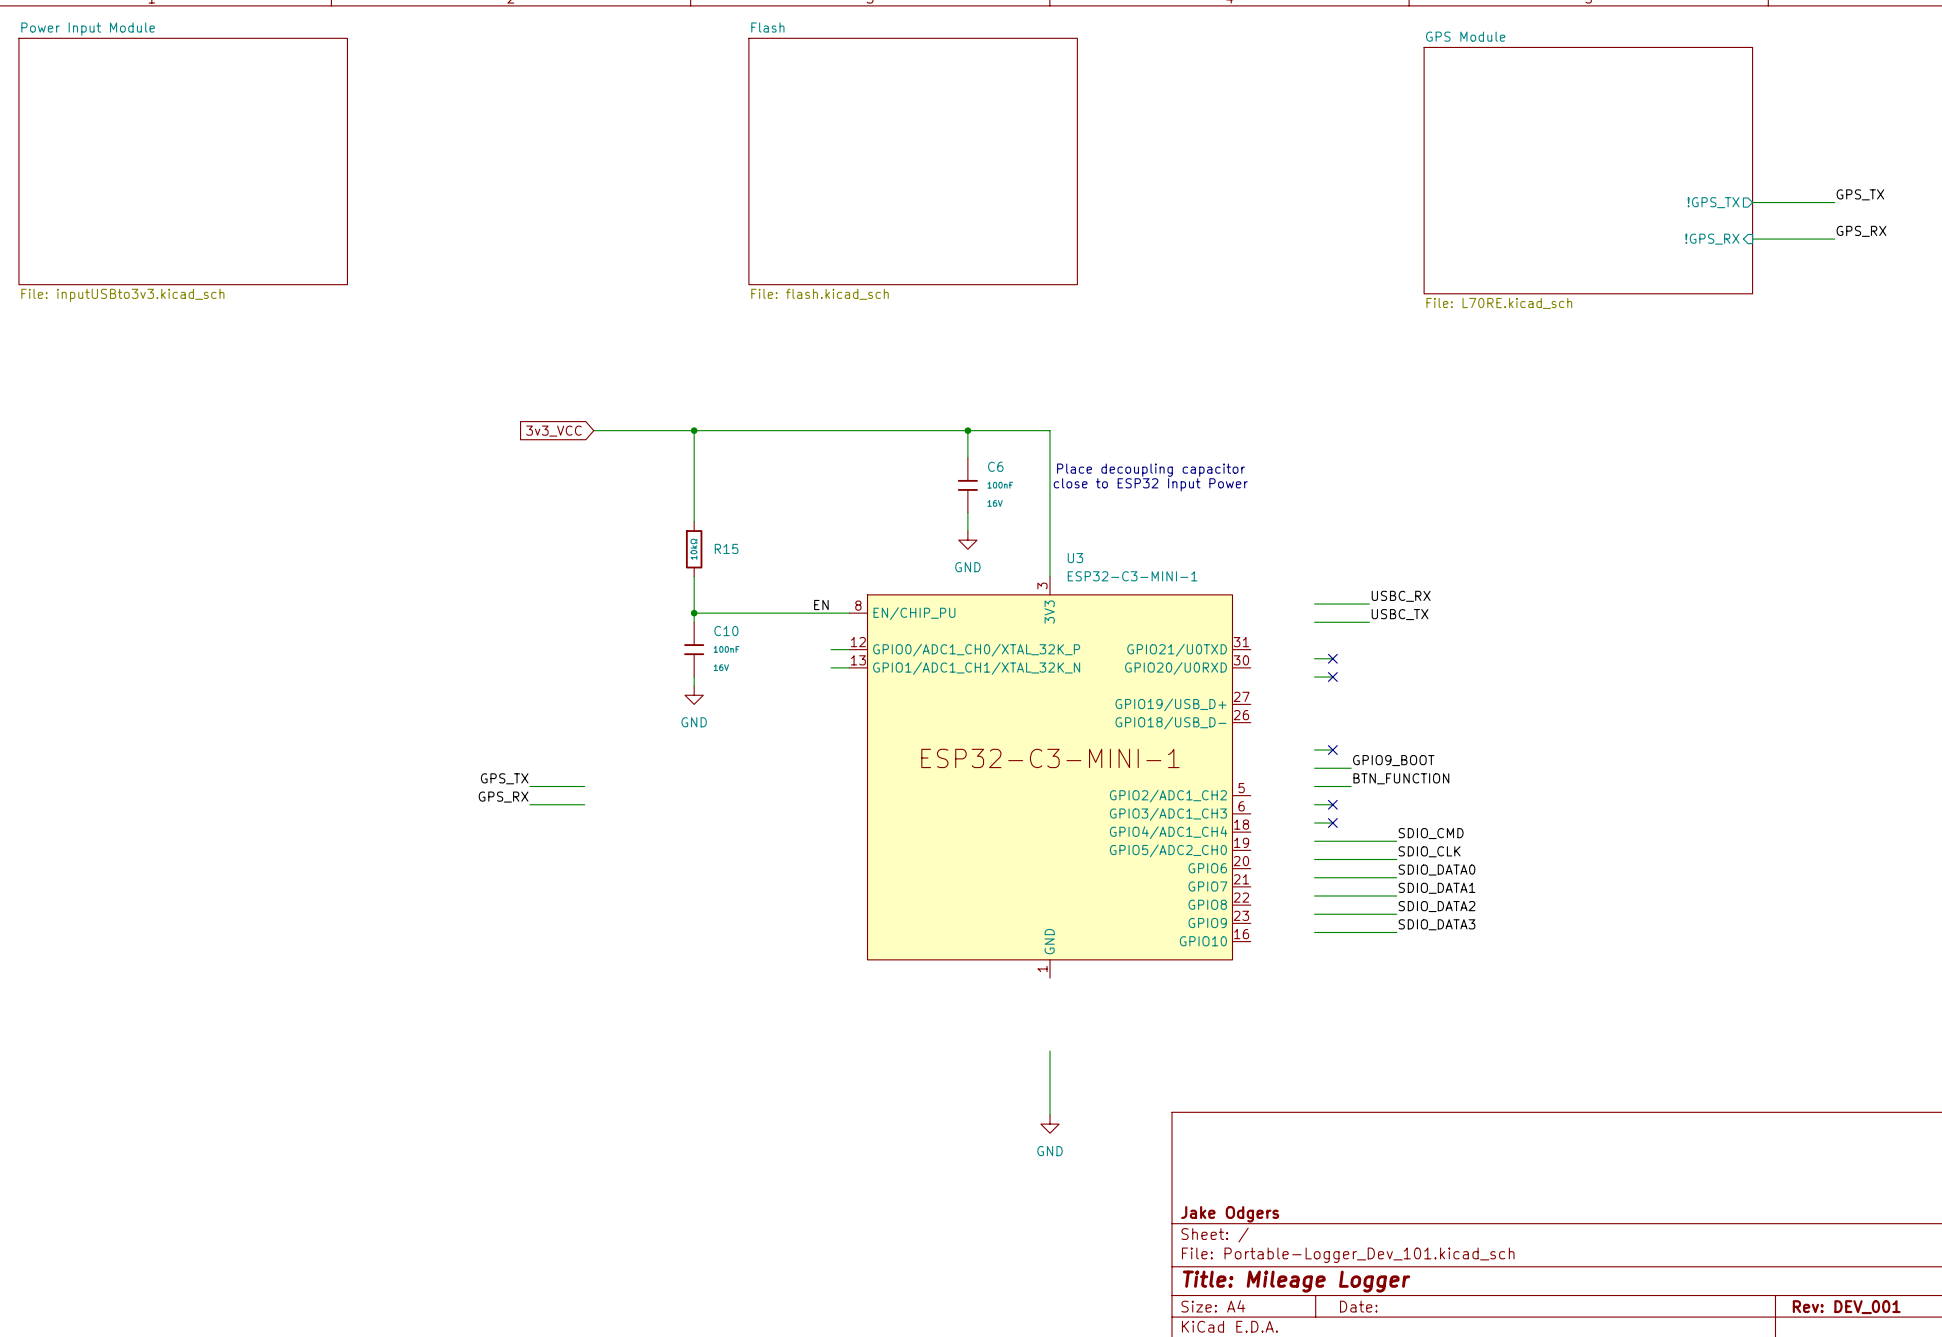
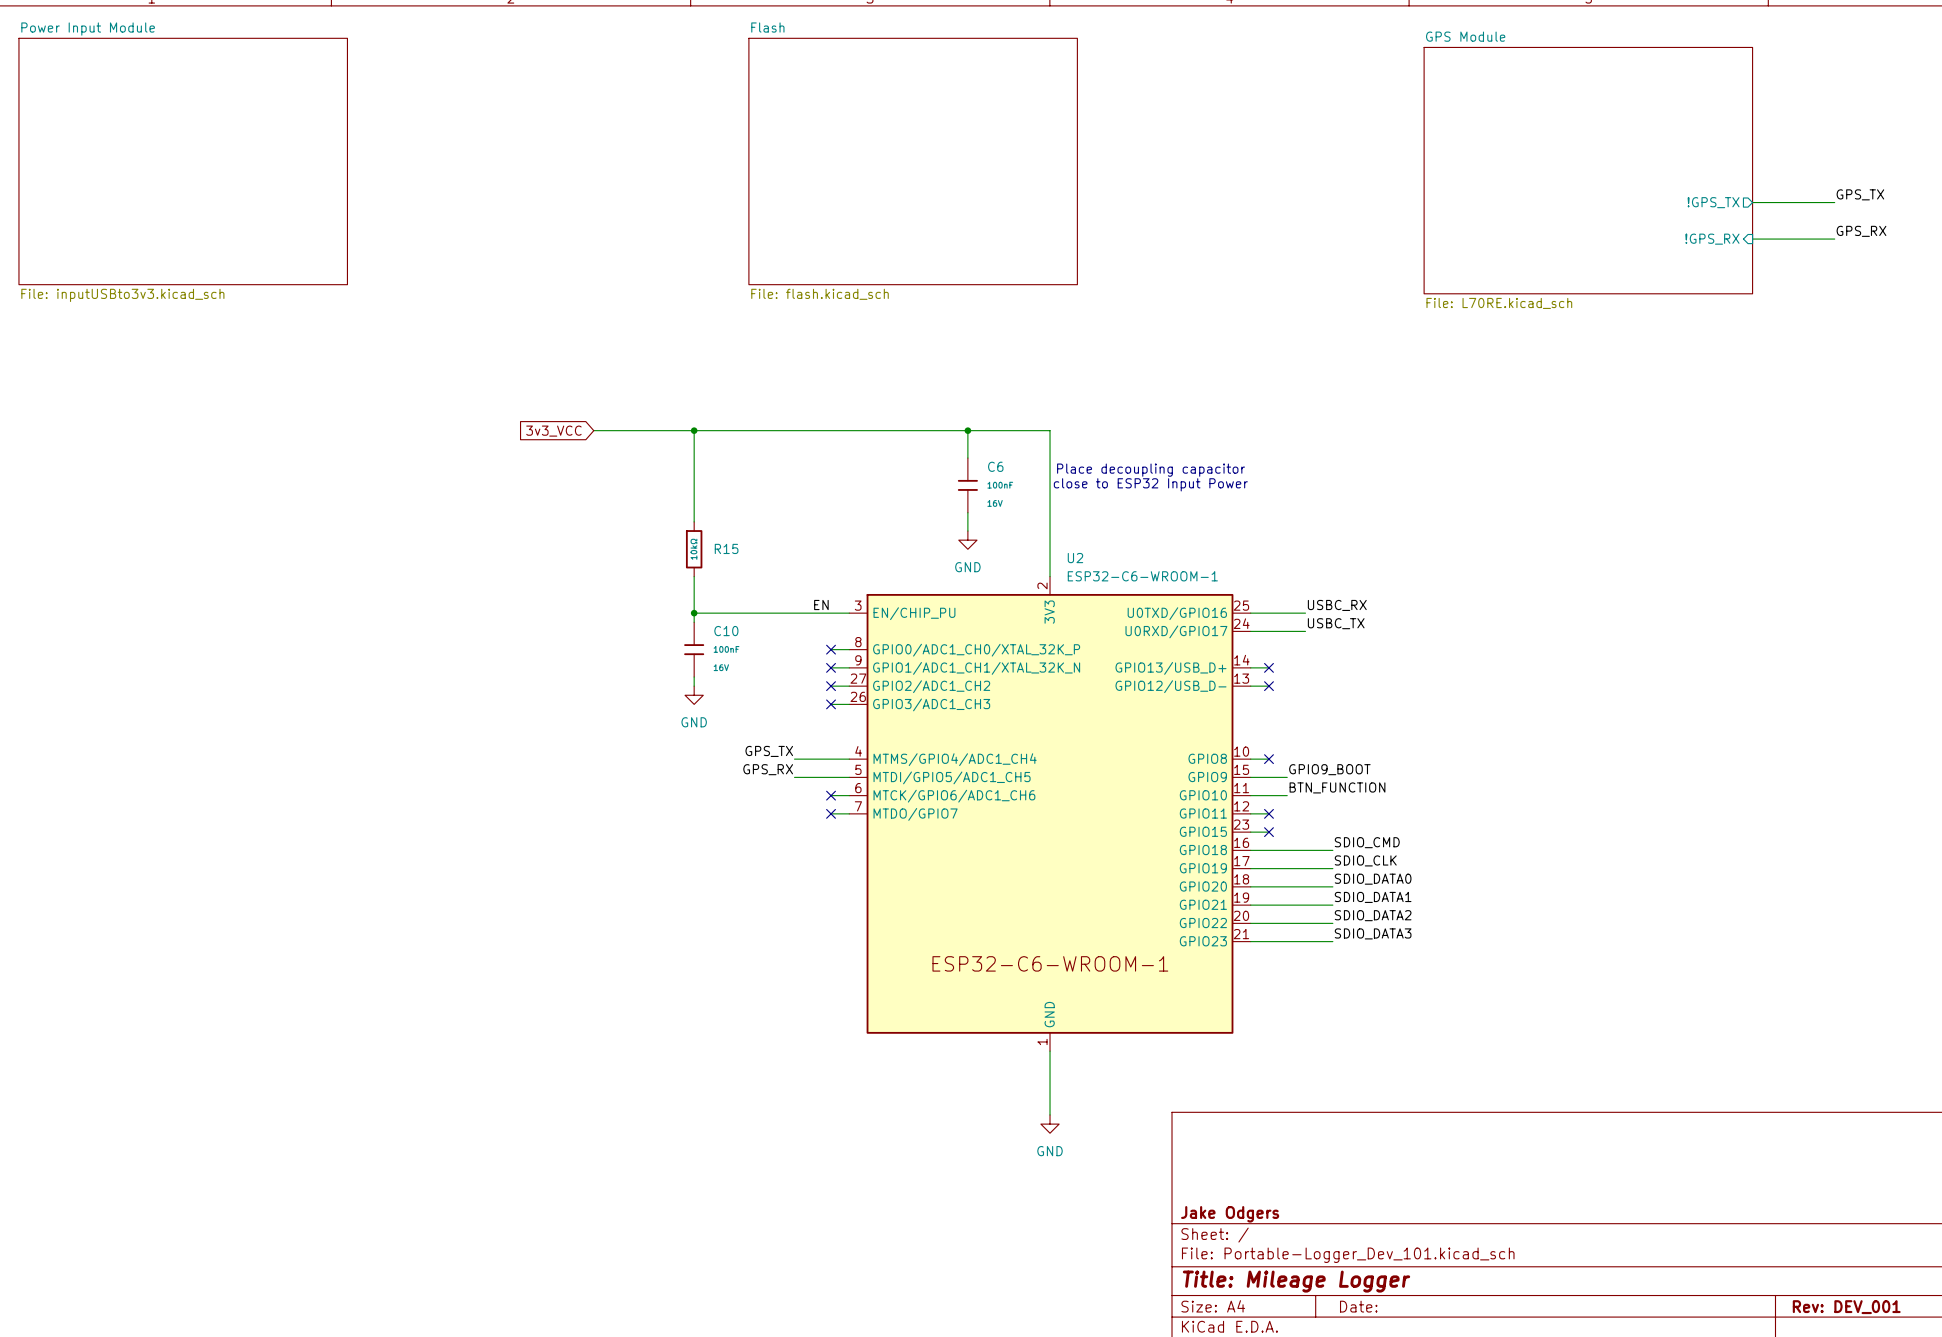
label position: USBC_RX (1401, 596) -> USBC_RX (1337, 605)
wire: (1314, 604) (1369, 604) -> (1250, 613) (1305, 613)
label position: USBC_TX (1400, 614) -> USBC_TX (1336, 623)
wire: (1314, 622) (1369, 622) -> (1250, 631) (1305, 631)
no-connect mark: none -> (831, 649)
wire: (1314, 658) (1332, 658) -> (1250, 667) (1268, 667)
no-connect mark: (1332, 658) -> none
no-connect mark: none -> (831, 667)
no-connect mark: none -> (1268, 667)
wire: (1314, 677) (1332, 677) -> (1250, 686) (1268, 686)
no-connect mark: (1332, 677) -> none
wire: none -> (831, 686) (849, 686)
no-connect mark: none -> (831, 686)
no-connect mark: none -> (1268, 686)
wire: none -> (831, 704) (849, 704)
no-connect mark: none -> (831, 704)
wire: (1314, 750) (1332, 750) -> (1250, 759) (1268, 759)
no-connect mark: (1332, 750) -> none
label: none -> GPS_TX (769, 751)
wire: none -> (794, 759) (849, 759)
no-connect mark: none -> (1268, 759)
label position: GPIO9_BOOT (1393, 760) -> GPIO9_BOOT (1329, 769)
wire: (1314, 768) (1351, 768) -> (1250, 777) (1287, 777)
label: none -> GPS_RX (768, 769)
wire: none -> (794, 777) (849, 777)
U3: ESP32-C3-MINI-1 (1050, 777) -> none
label: GPS_TX (504, 778) -> none
label position: BTN_FUNCTION (1401, 778) -> BTN_FUNCTION (1337, 787)
wire: (529, 786) (584, 786) -> none
wire: (1314, 786) (1351, 786) -> (1250, 795) (1287, 795)
wire: none -> (831, 795) (849, 795)
no-connect mark: none -> (831, 795)
label: GPS_RX (503, 797) -> none
wire: (529, 804) (584, 804) -> none
wire: (1314, 804) (1332, 804) -> (1250, 813) (1268, 813)
no-connect mark: (1332, 804) -> none
wire: none -> (831, 813) (849, 813)
no-connect mark: none -> (831, 813)
U2: none -> ESP32-C6-WROOM-1 (1050, 813)
no-connect mark: none -> (1268, 813)
wire: (1314, 823) (1332, 823) -> (1250, 832) (1268, 832)
no-connect mark: (1332, 823) -> none
no-connect mark: none -> (1268, 832)
label position: SDIO_CMD (1431, 833) -> SDIO_CMD (1367, 842)
wire: (1314, 841) (1396, 841) -> (1250, 850) (1332, 850)
label position: SDIO_CLK (1429, 851) -> SDIO_CLK (1365, 860)
wire: (1314, 859) (1396, 859) -> (1250, 868) (1332, 868)
label position: SDIO_DATA0 (1436, 870) -> SDIO_DATA0 (1373, 879)
wire: (1314, 877) (1396, 877) -> (1250, 886) (1332, 886)
label position: SDIO_DATA1 (1436, 888) -> SDIO_DATA1 (1373, 897)
wire: (1314, 895) (1396, 895) -> (1250, 905) (1332, 905)
label position: SDIO_DATA2 (1436, 906) -> SDIO_DATA2 (1373, 915)
wire: (1314, 914) (1396, 914) -> (1250, 923) (1332, 923)
label position: SDIO_DATA3 (1436, 924) -> SDIO_DATA3 (1373, 933)
wire: (1314, 932) (1396, 932) -> (1250, 941) (1332, 941)

